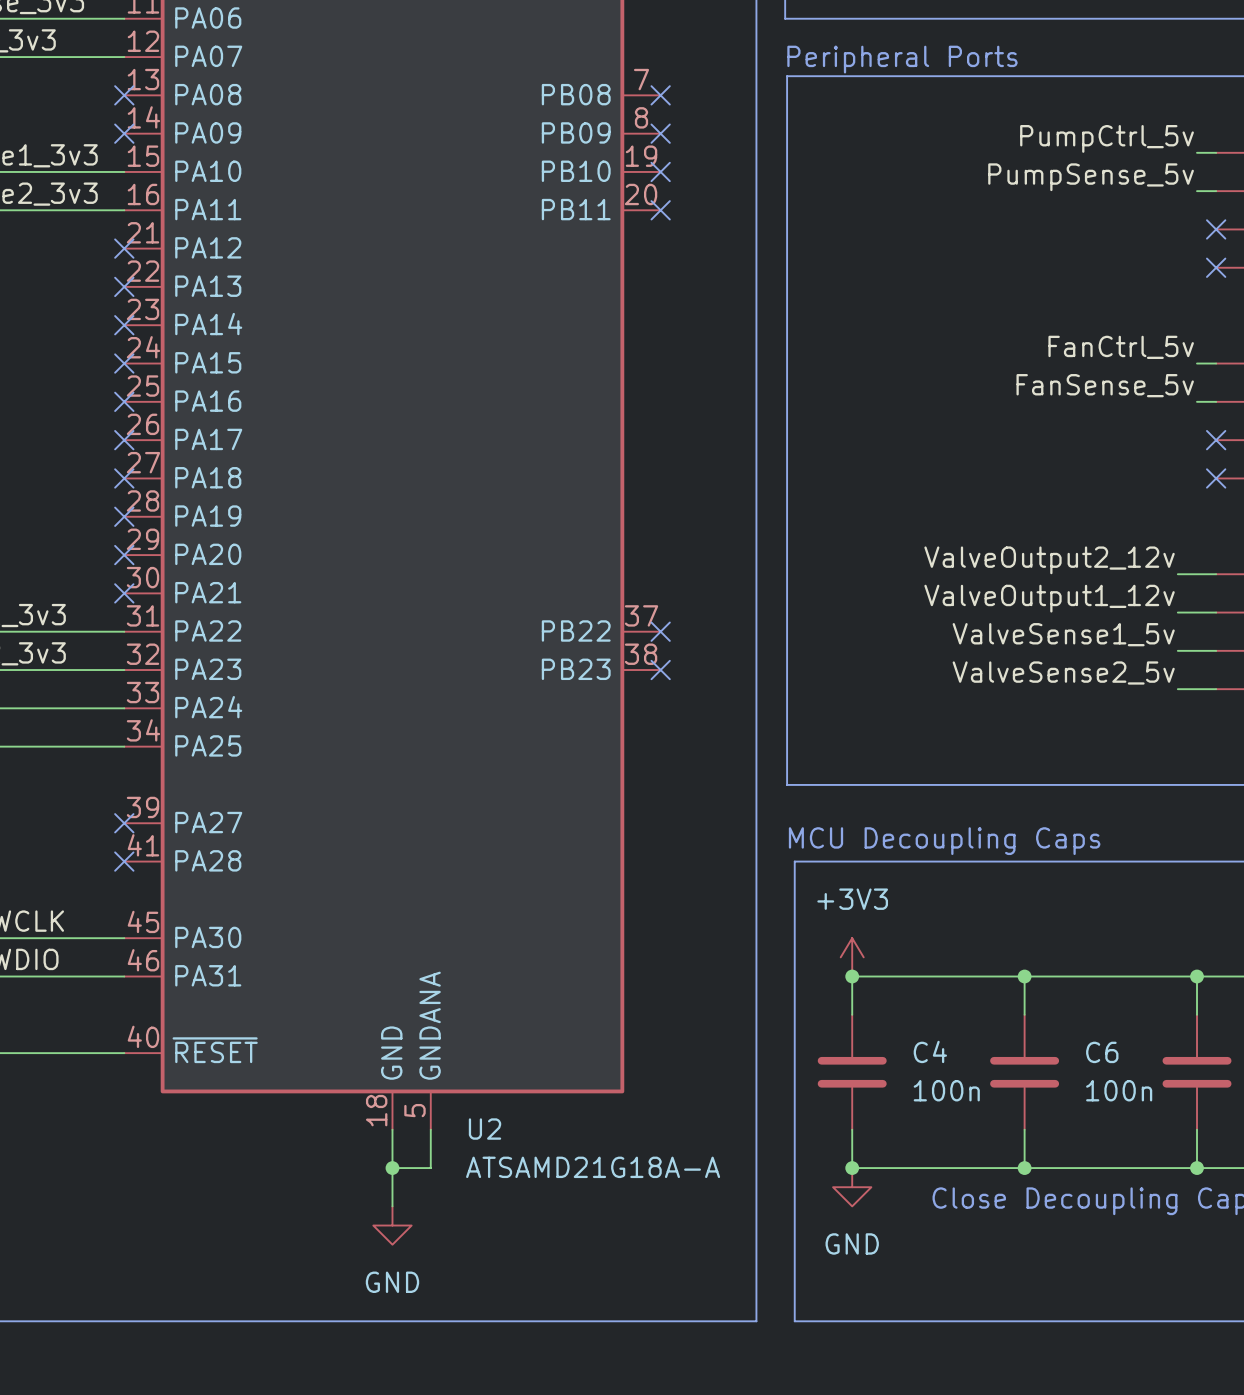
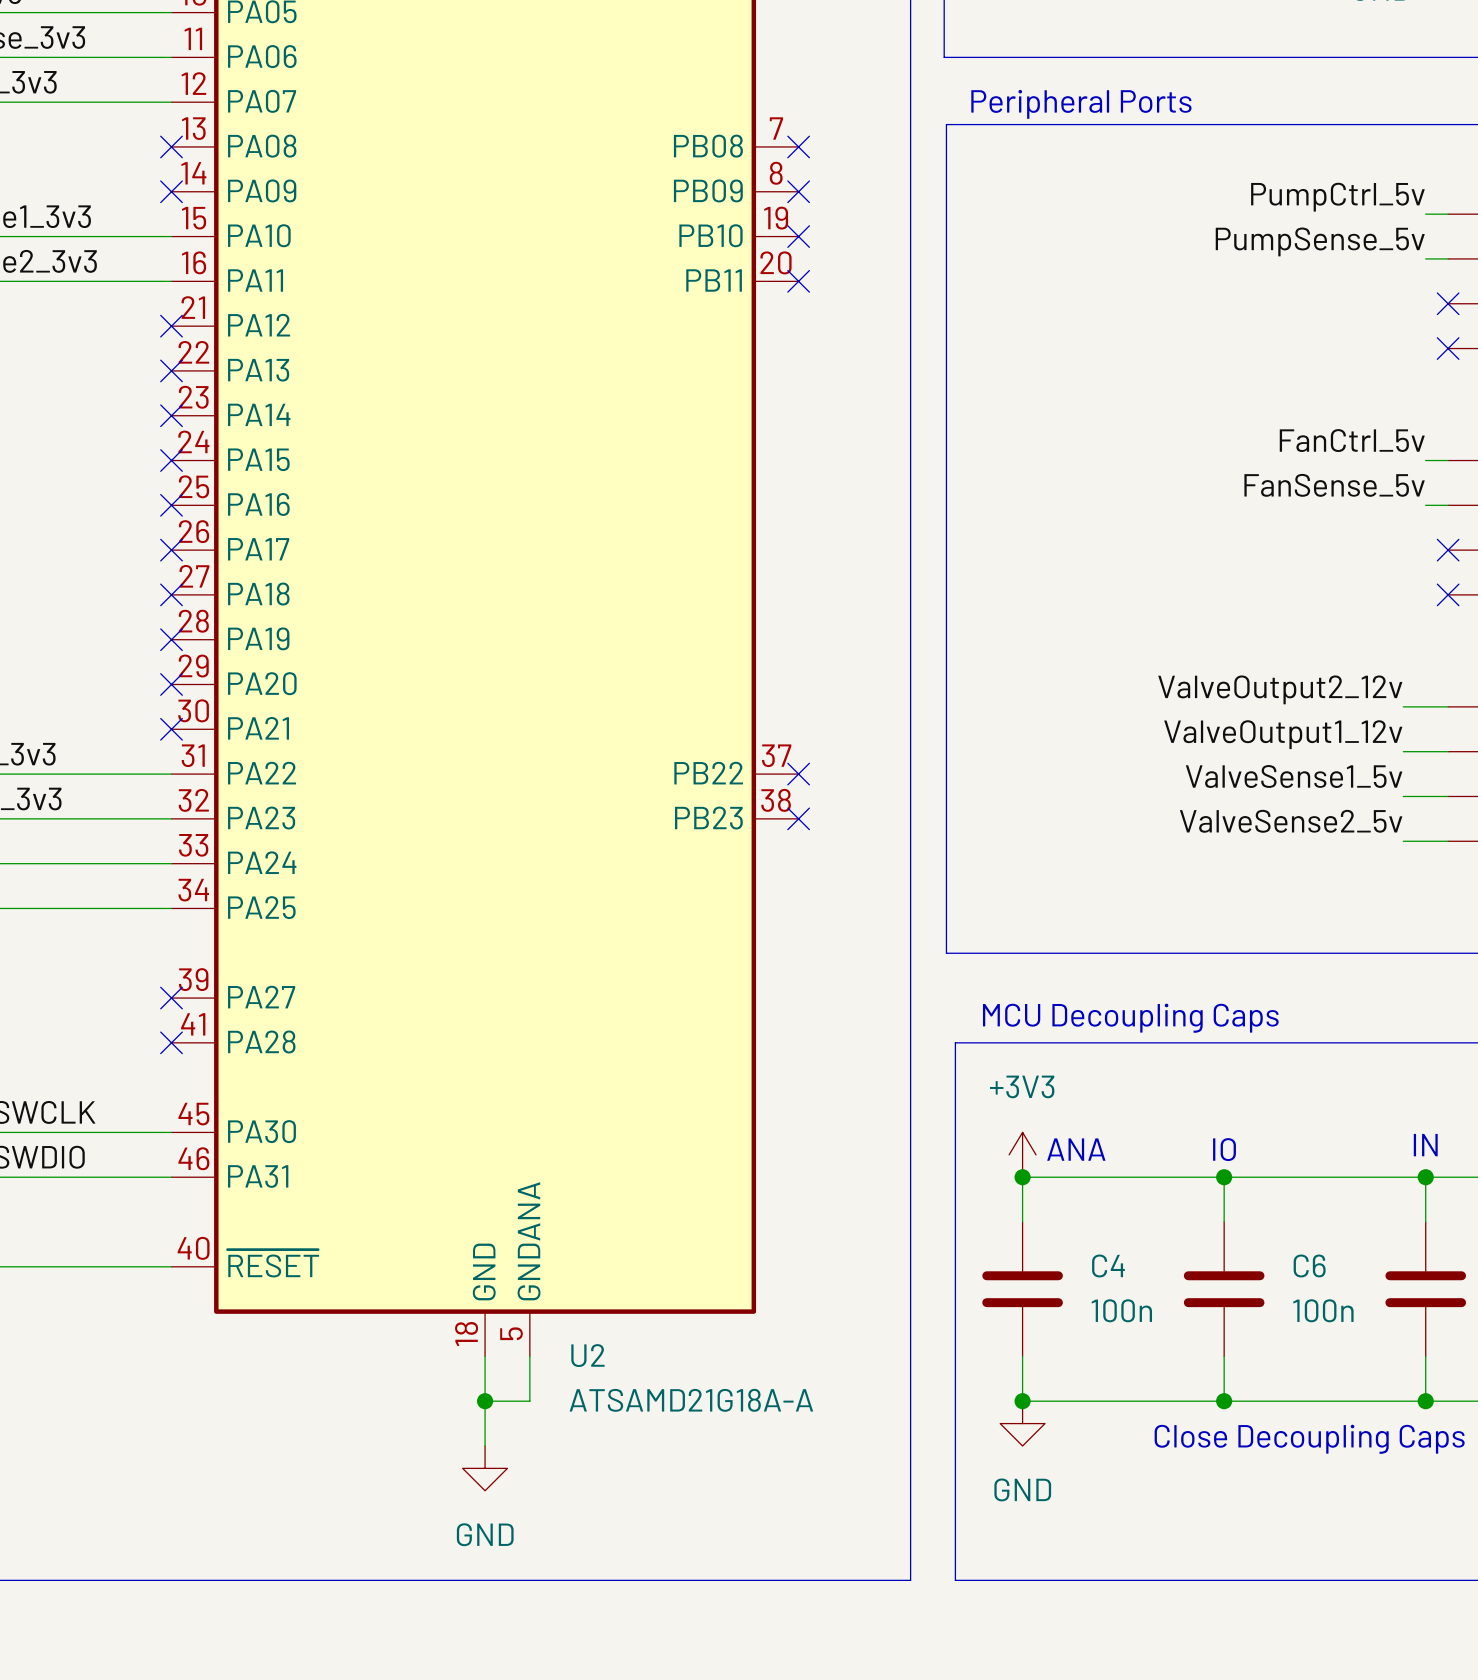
text: none -> IN (1425, 1145)
text: none -> ANA (1076, 1149)
text: none -> IO (1224, 1149)

